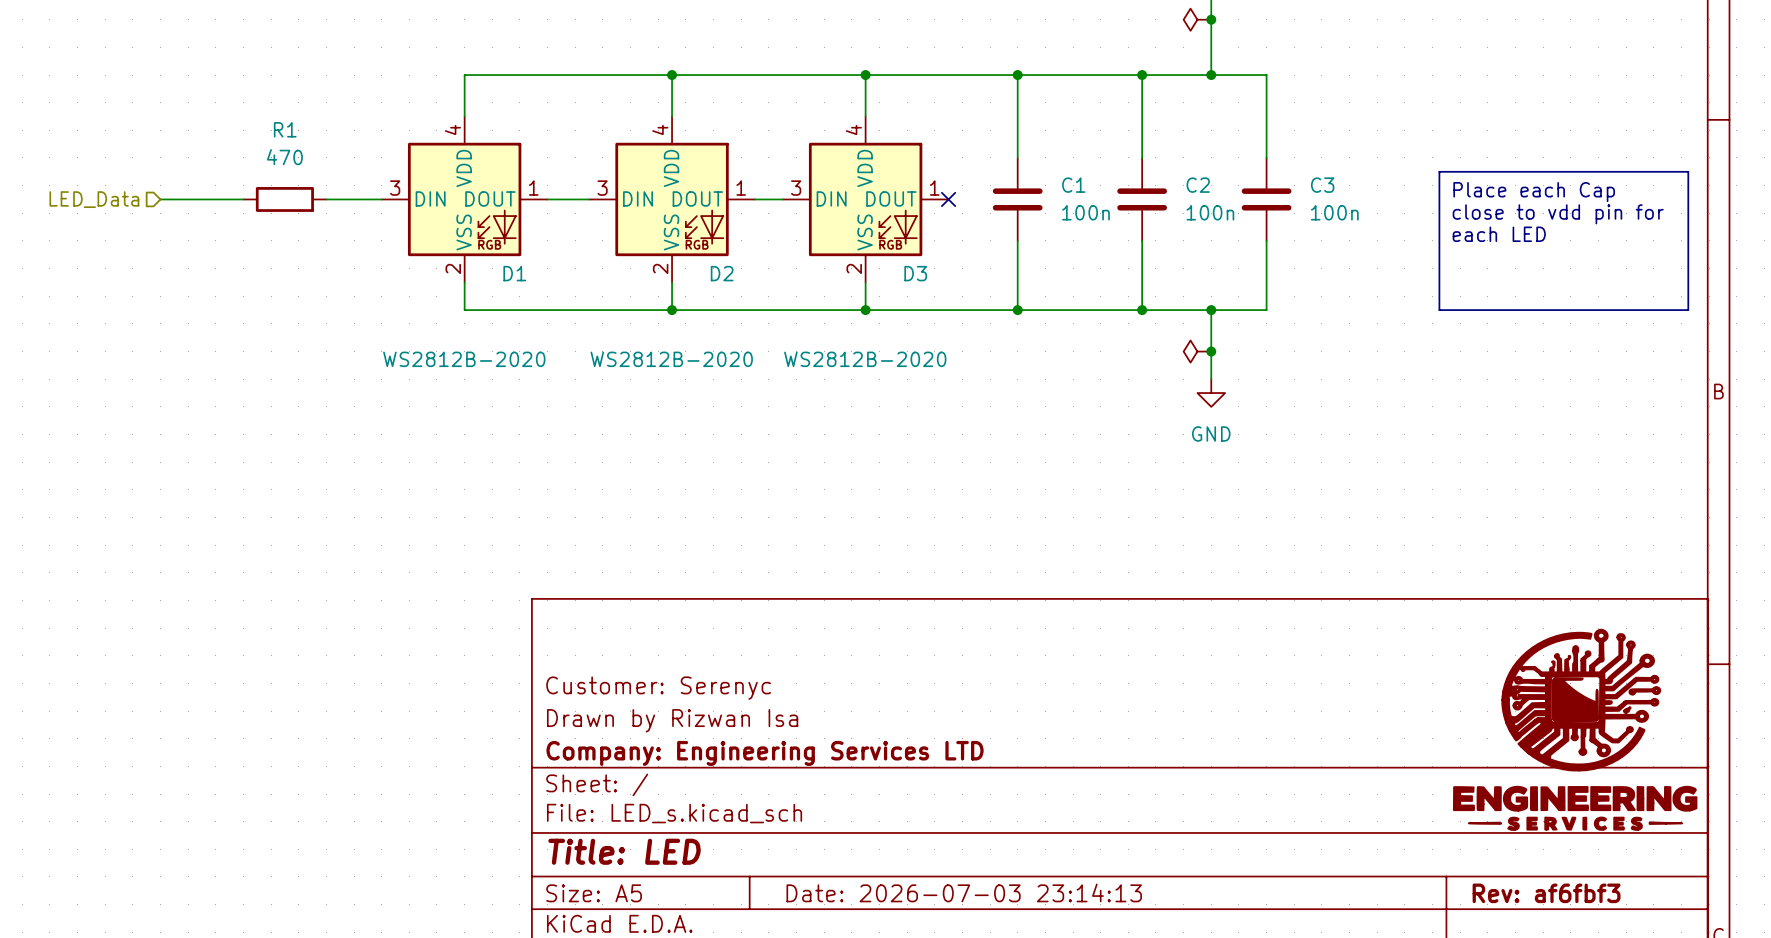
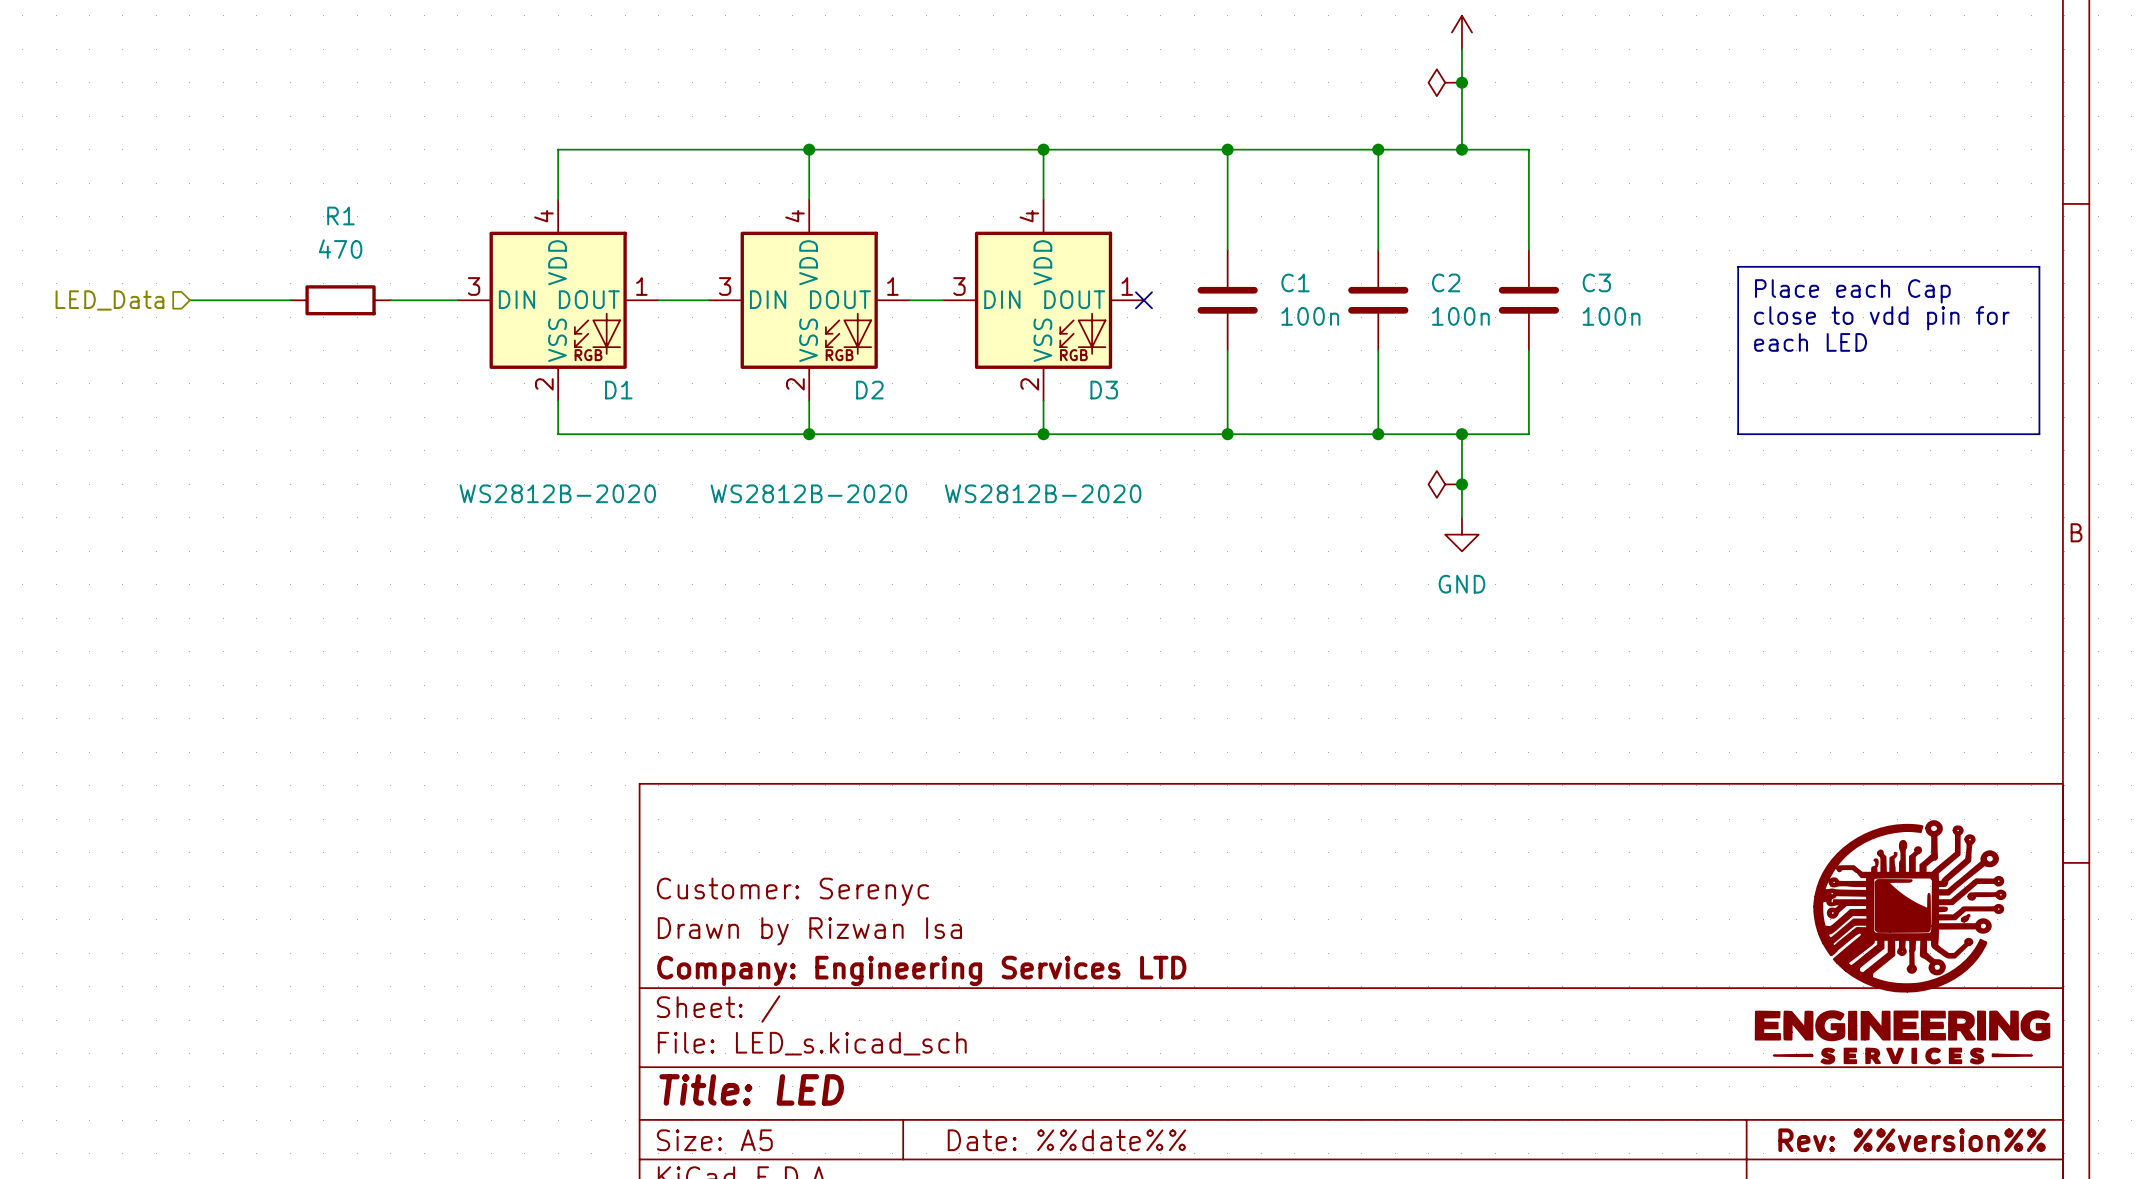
title block: Date: 2026-07-03 23:14:13 (964, 892) -> Date: %%date%% (1066, 1140)
title block: Rev: af6fbf3 (1546, 893) -> Rev: %%version%% (1912, 1140)

